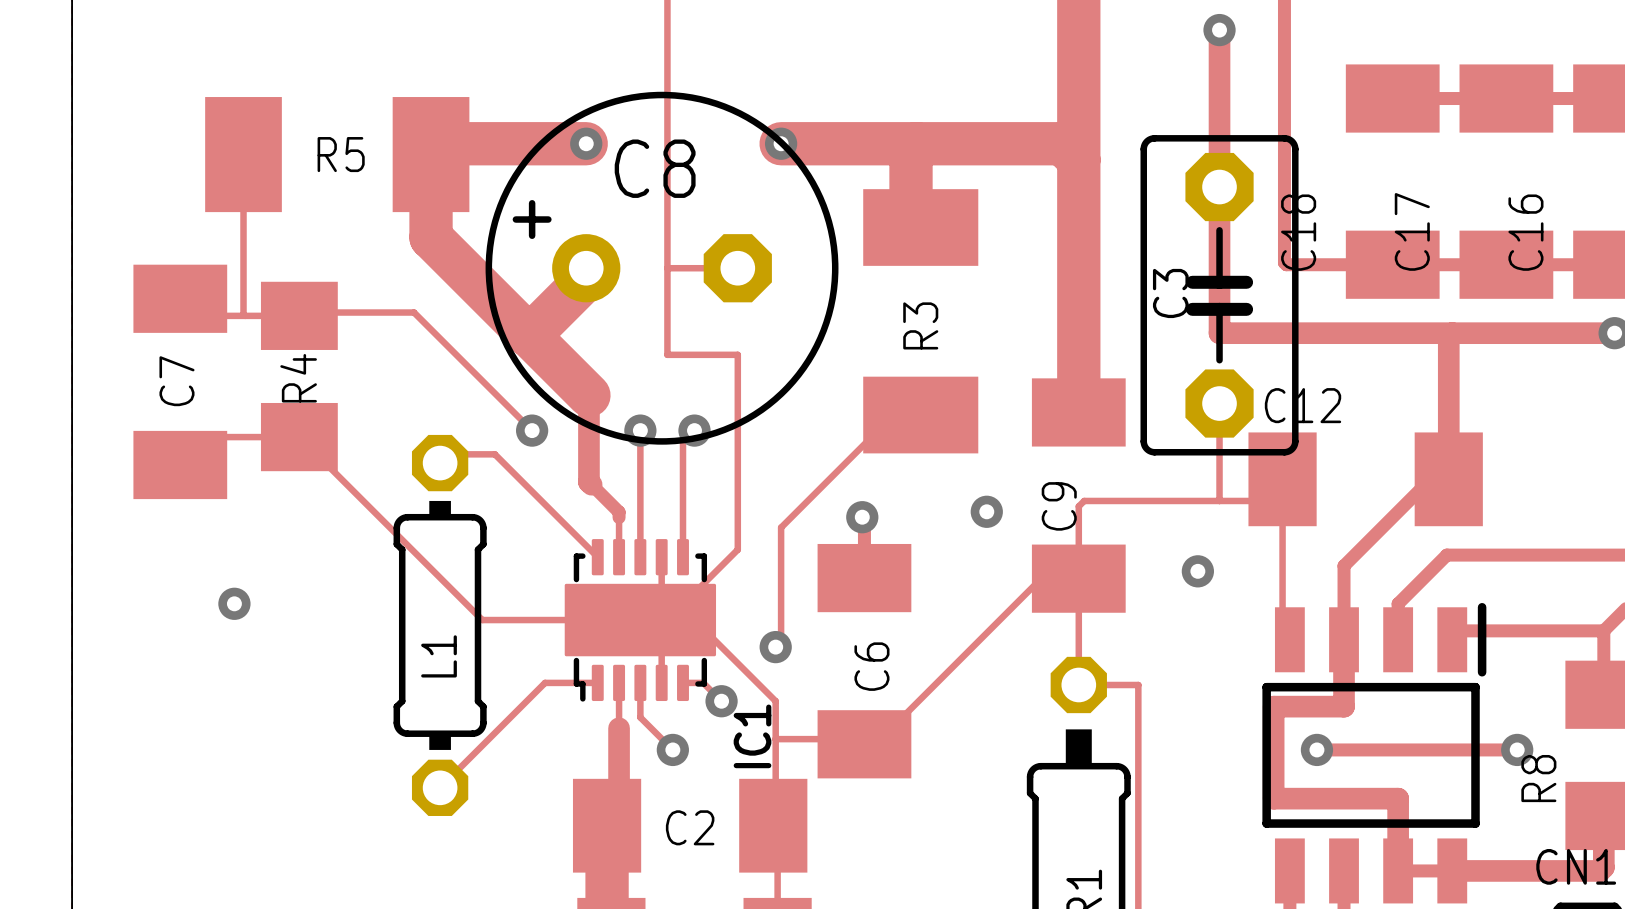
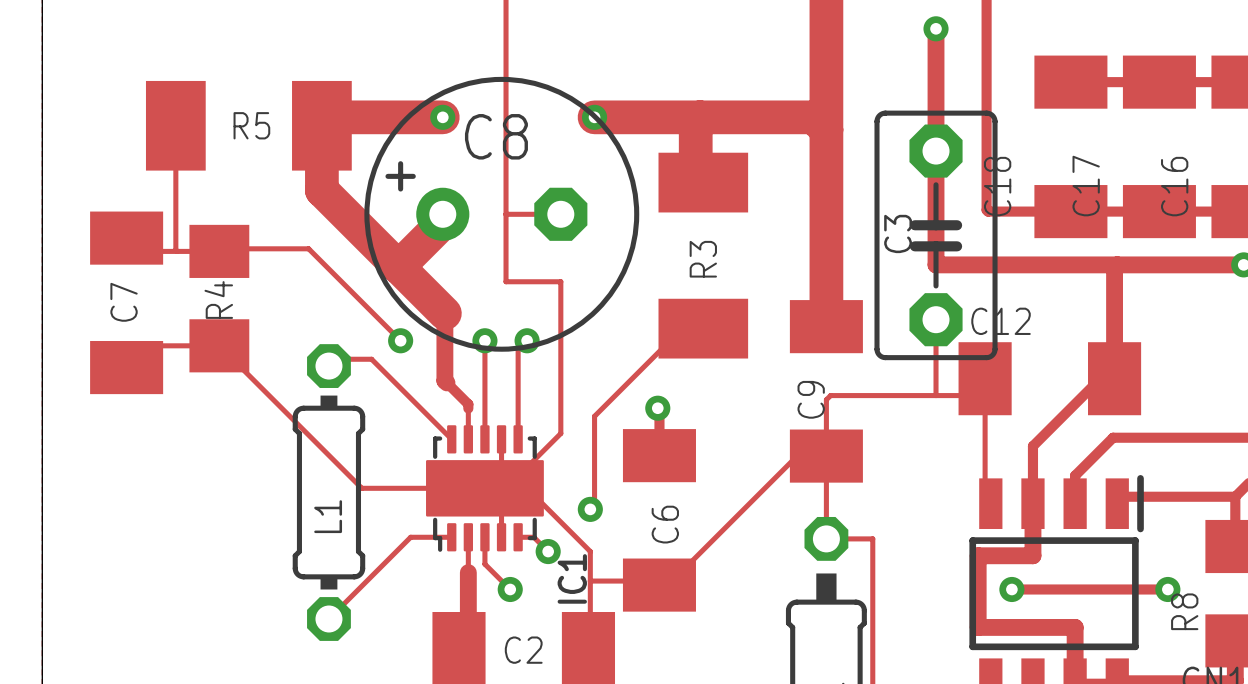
via: (986, 511) -> none
via: (1197, 571) -> none
via: (234, 603) -> none

